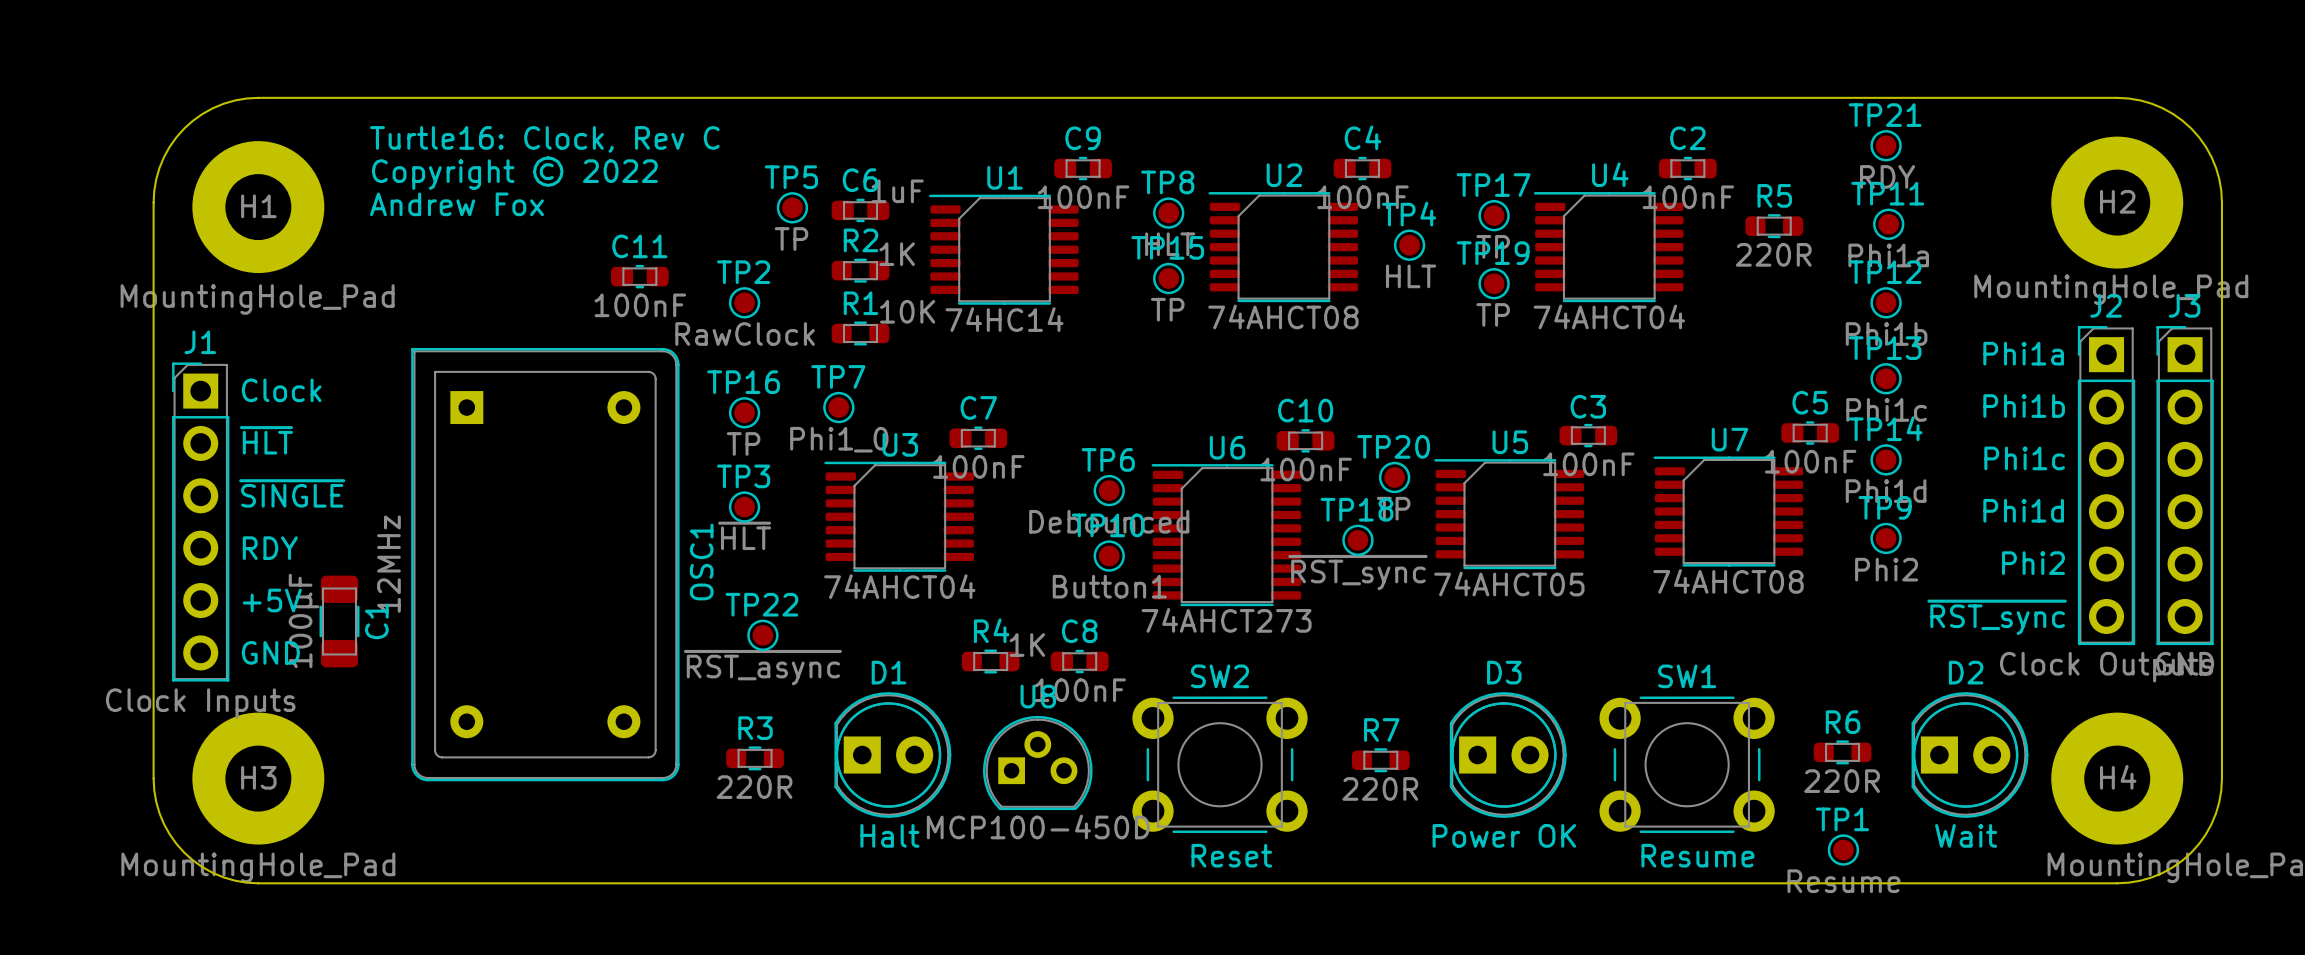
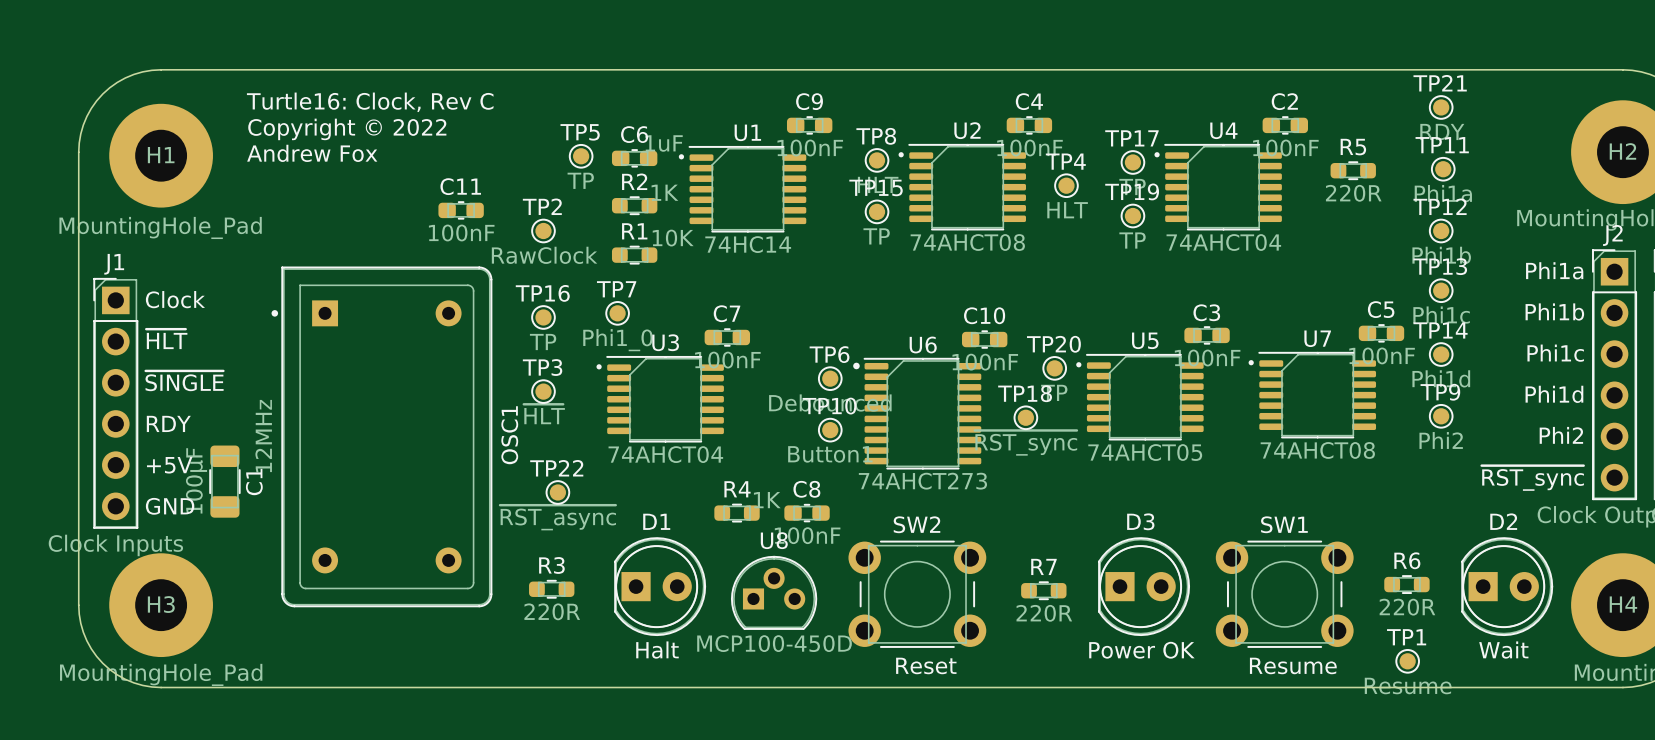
U2 footprint: [1208, 192, 1359, 303] -> [898, 143, 1027, 231]
U4 footprint: [1533, 192, 1684, 303] -> [1154, 143, 1282, 231]
U1 footprint: [929, 194, 1079, 305] -> [678, 145, 807, 233]
OSC1 footprint: [411, 347, 680, 782] -> [271, 266, 493, 608]
U7 footprint: [1653, 456, 1804, 567] -> [1248, 351, 1377, 439]
U5 footprint: [1434, 459, 1585, 570] -> [1076, 353, 1204, 441]
U3 footprint: [824, 461, 975, 572] -> [596, 355, 724, 443]
U6 footprint: [1151, 464, 1302, 607] -> [853, 357, 982, 470]

